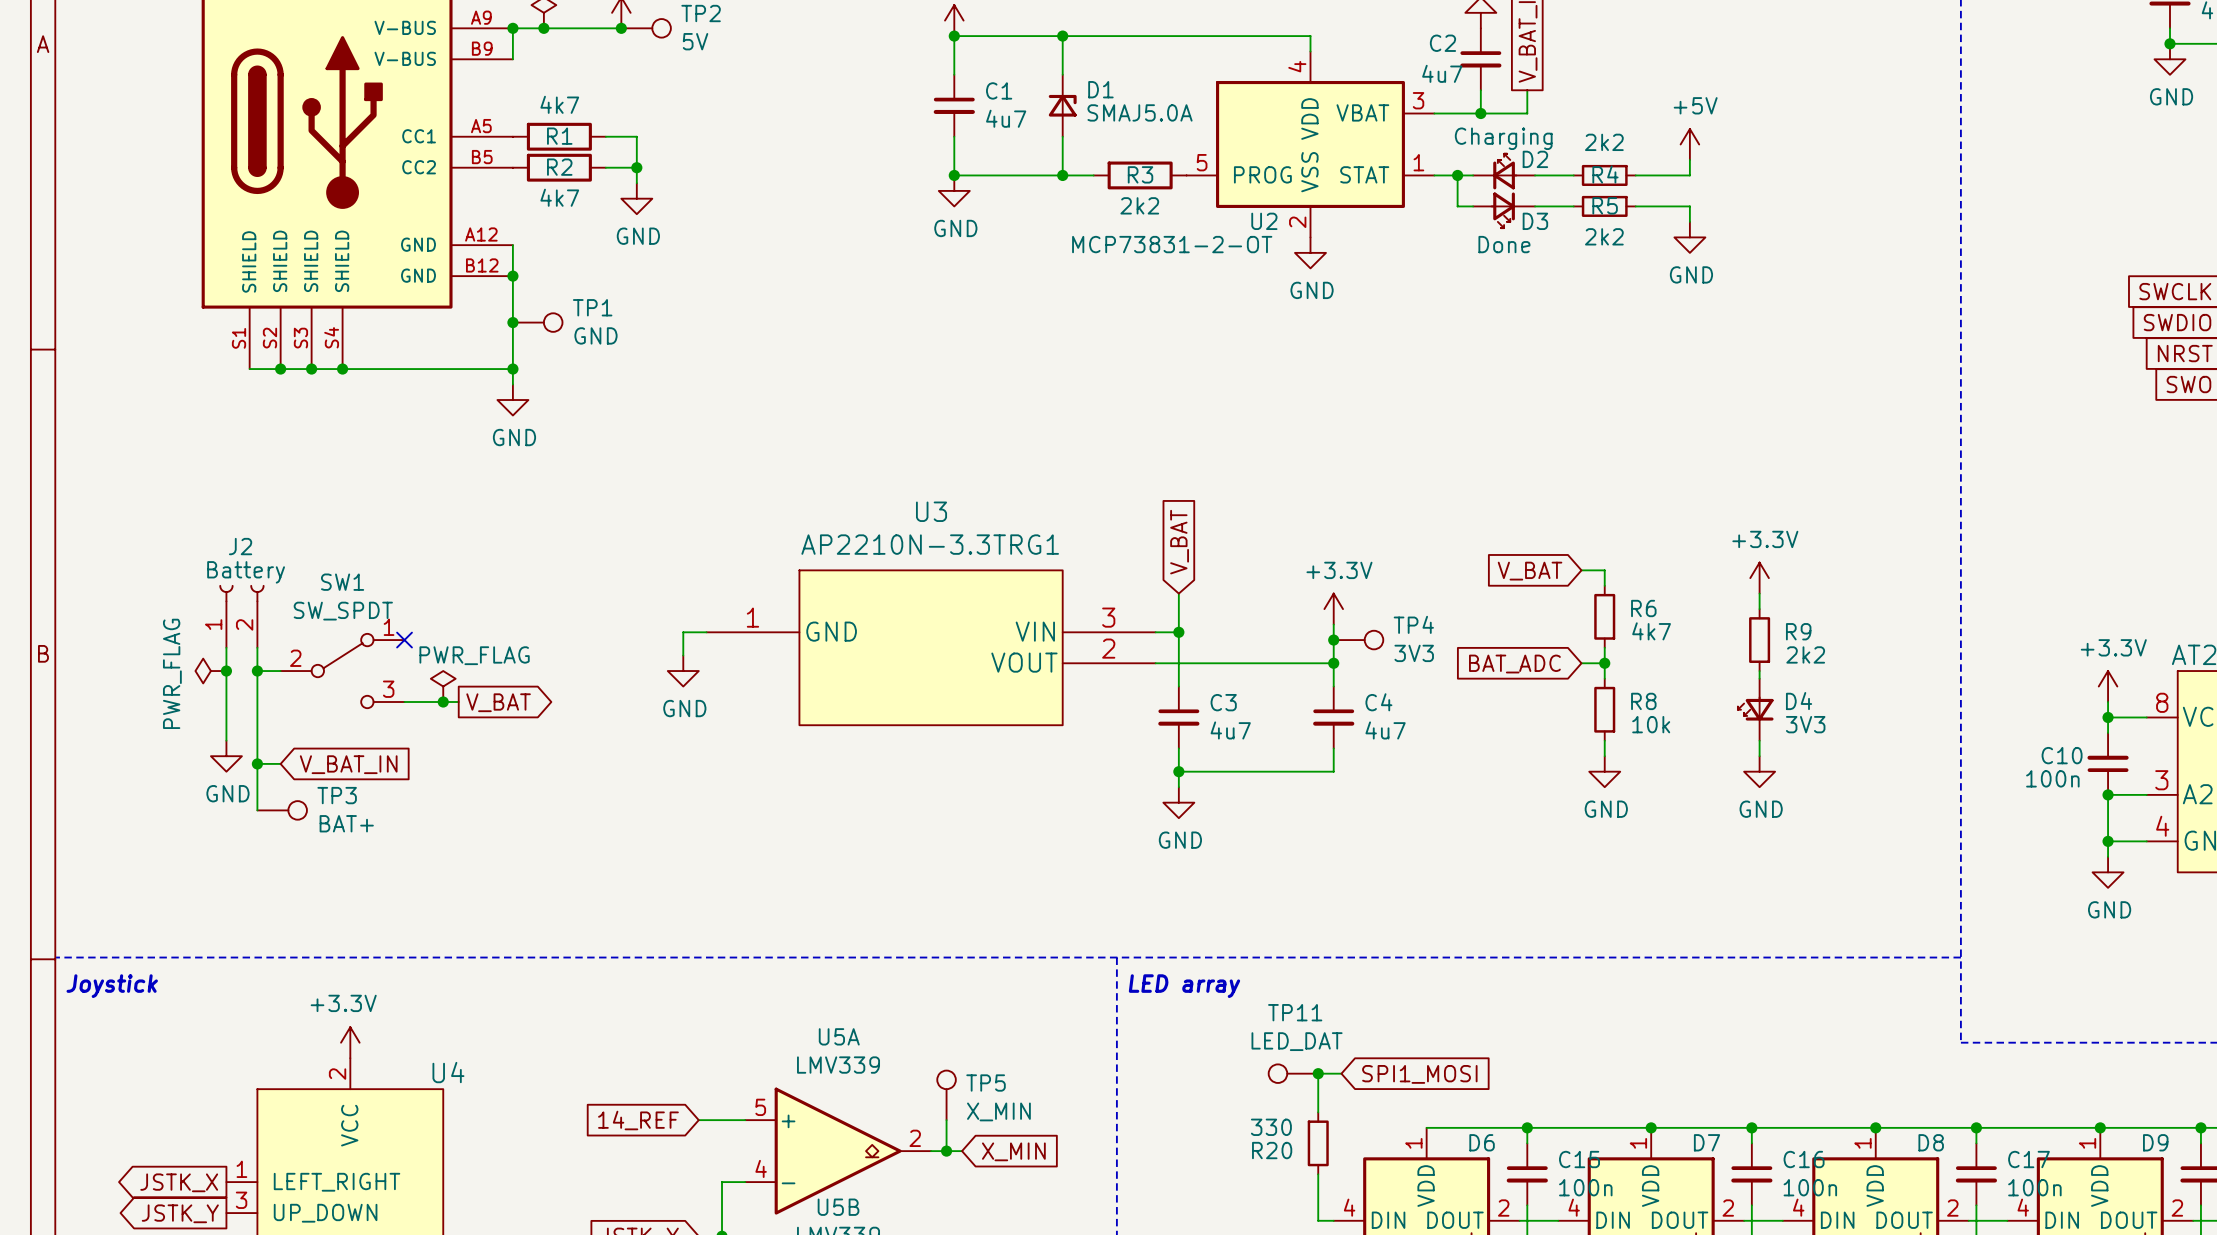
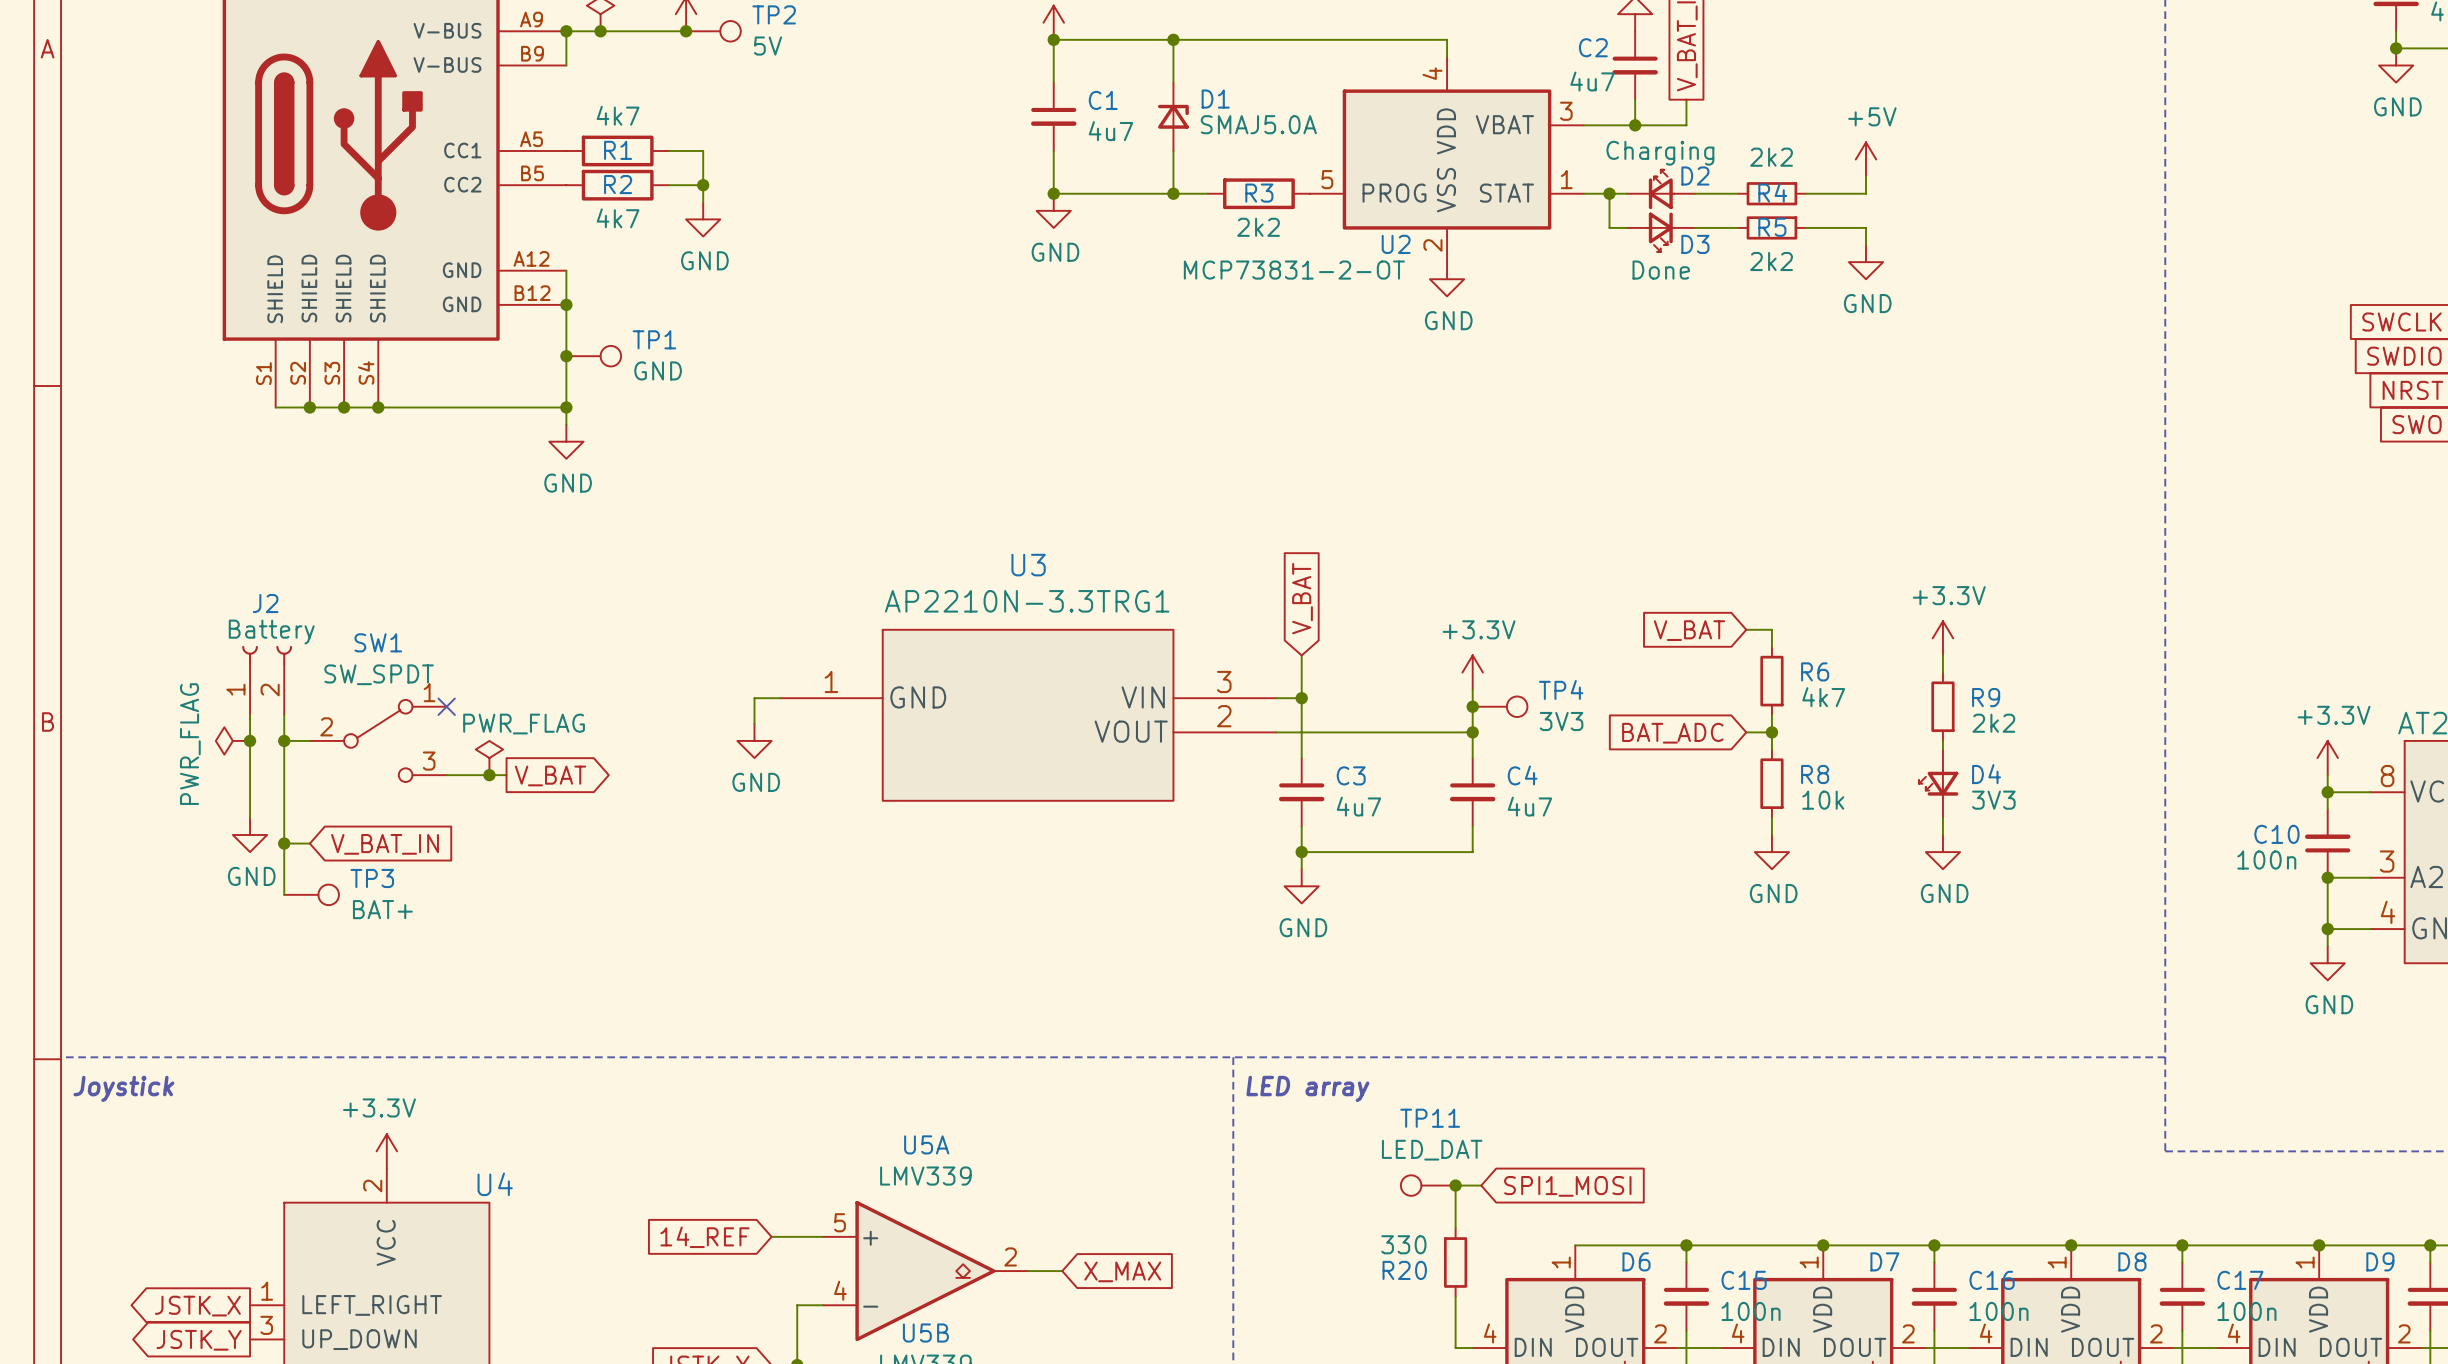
TP5: X_MIN (946, 1095) -> none
wire: (946, 1120) (946, 1151) -> none
junction: (946, 1151) -> none
global label: X_MIN (1013, 1151) -> X_MAX (1122, 1271)

